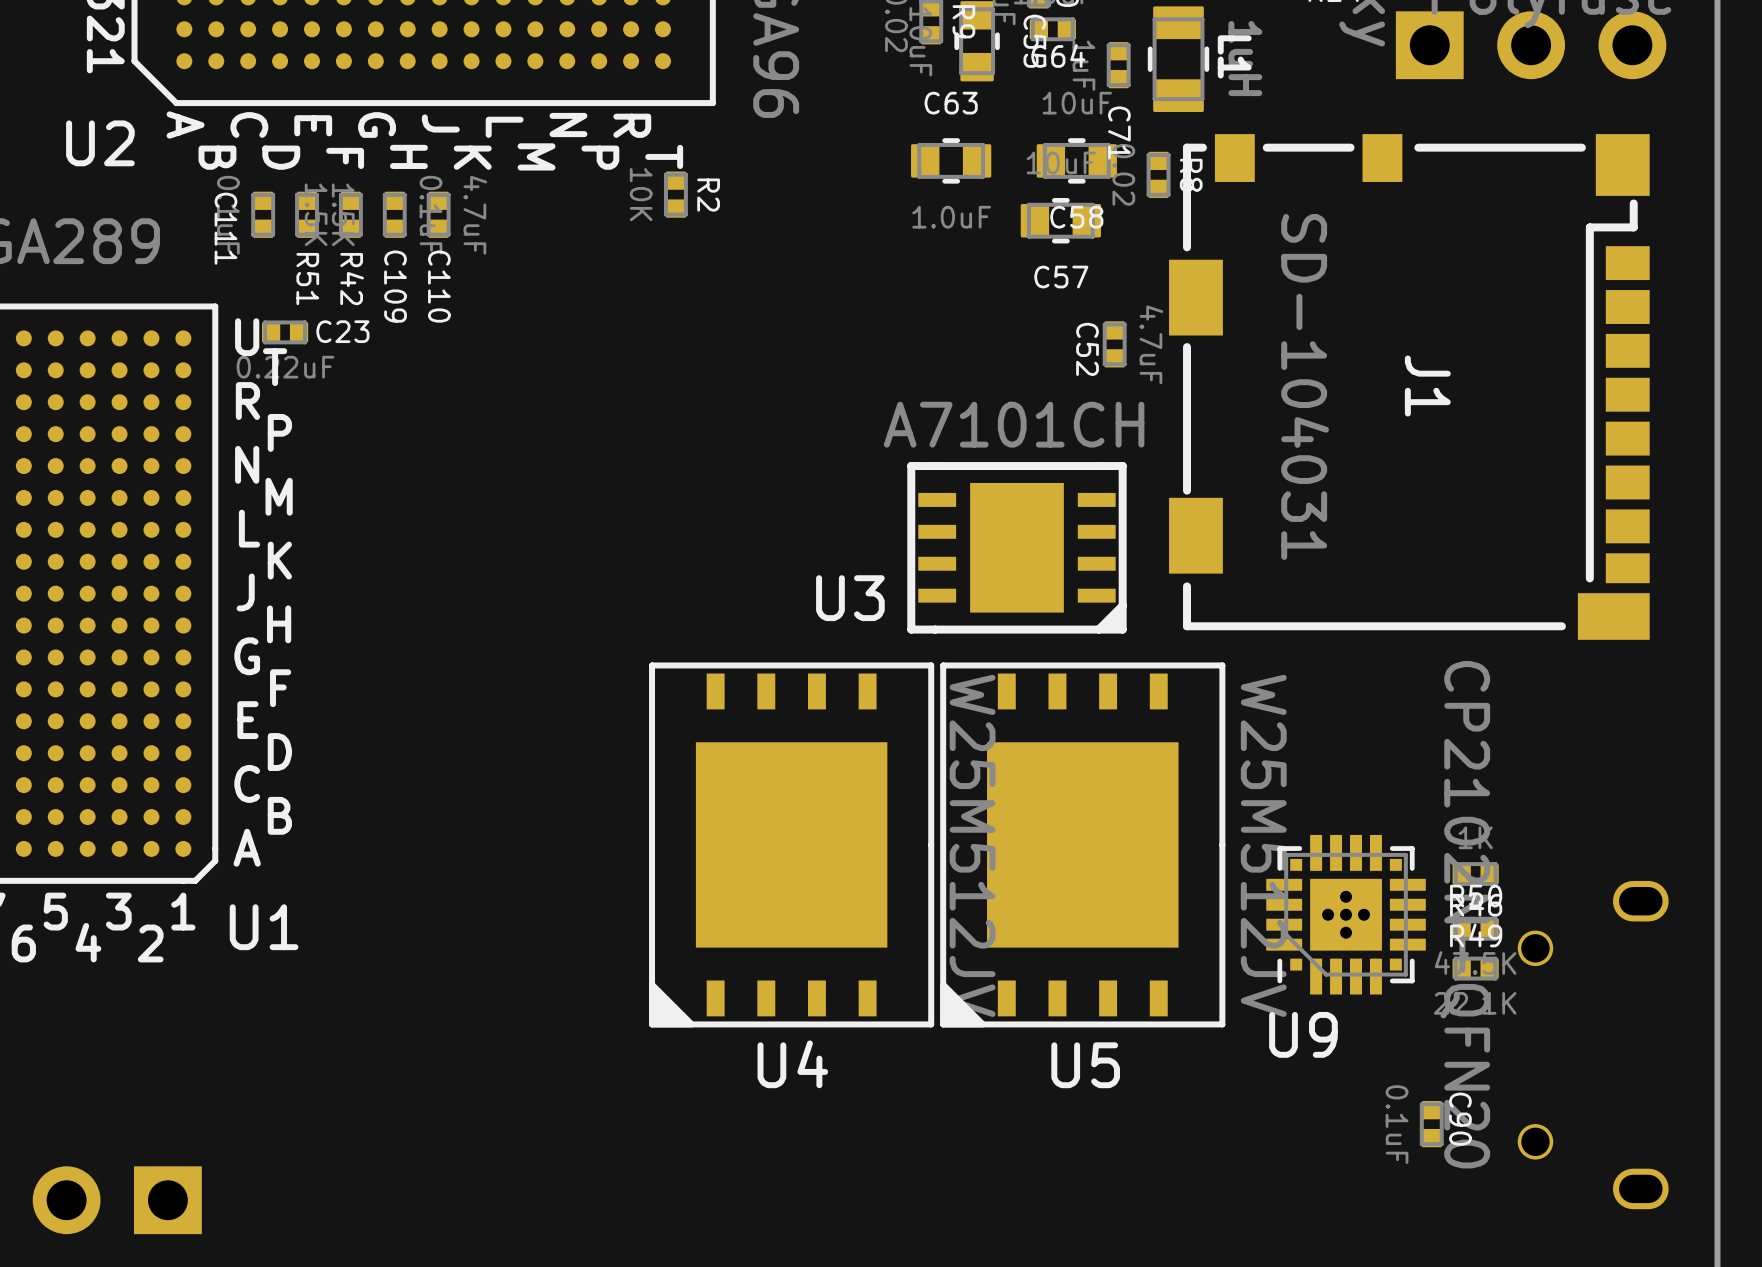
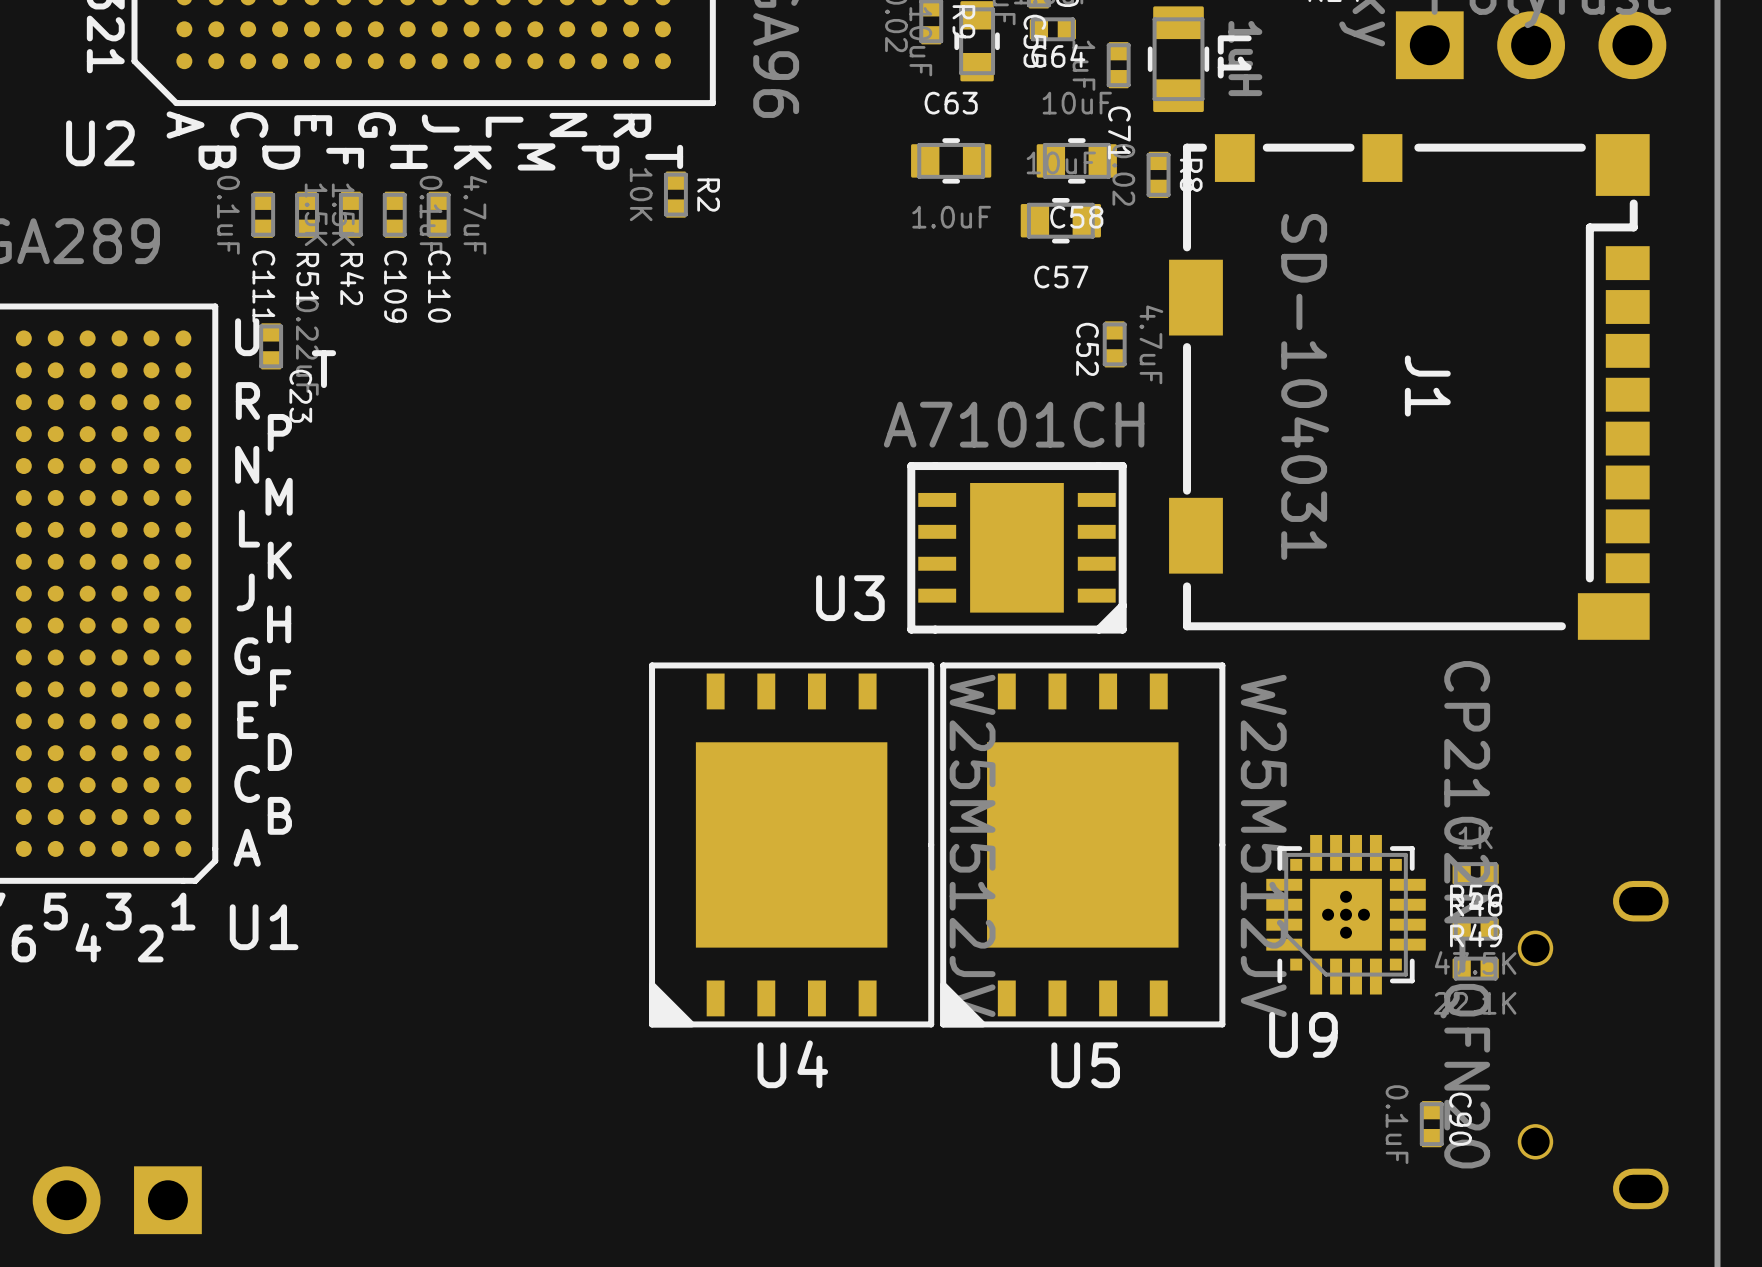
C111 name position: C111 (225, 228) -> C111 (263, 286)
C23 rotation: 0° (285, 332) -> 90° clockwise (271, 346)
U1 text position: T (275, 367) -> T (323, 369)

